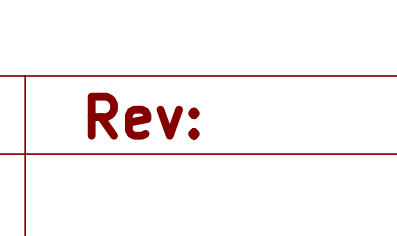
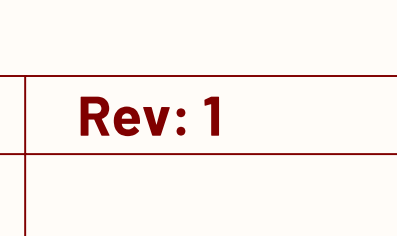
title block: Rev: (143, 116) -> Rev: 1 (149, 116)

